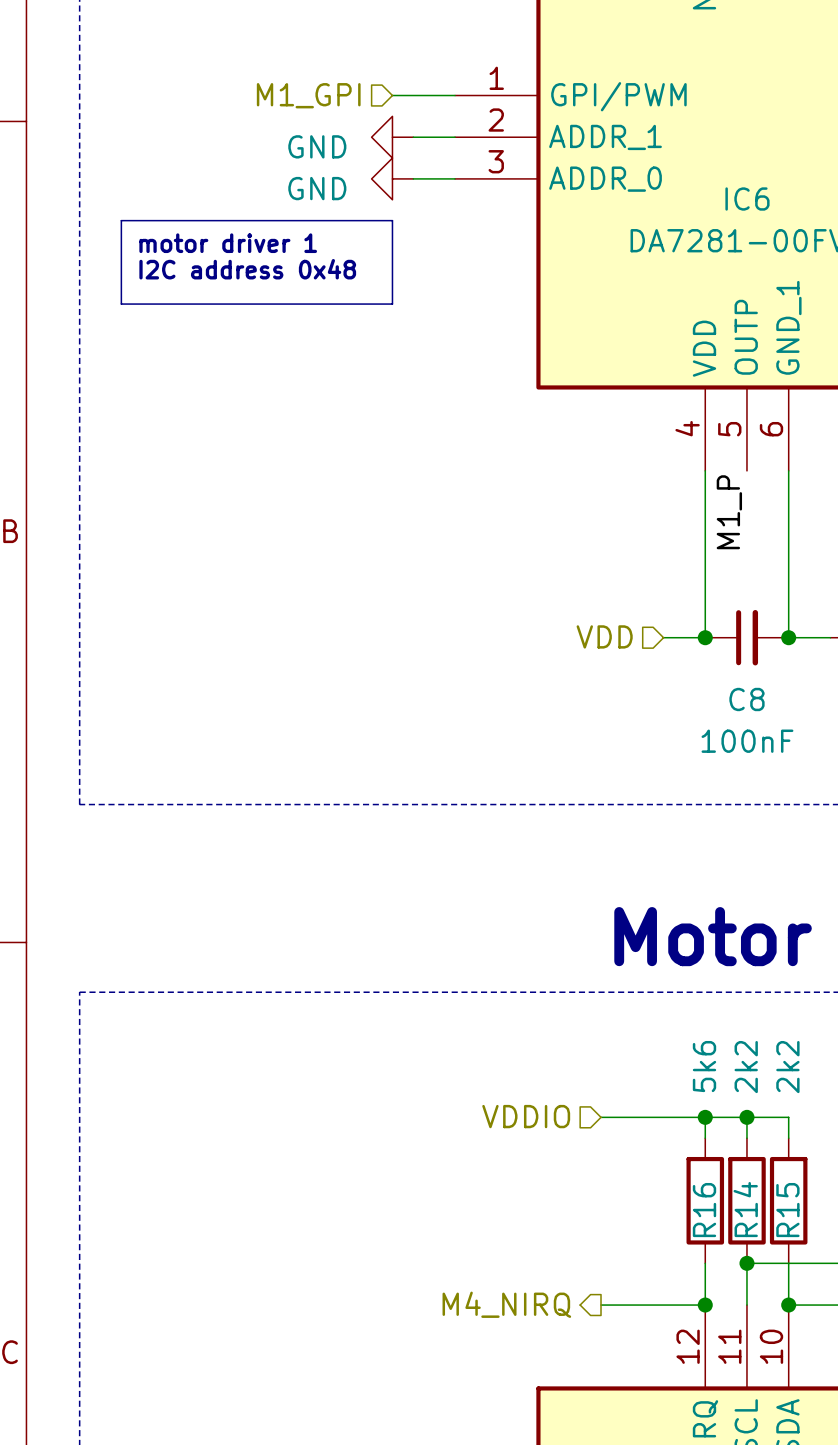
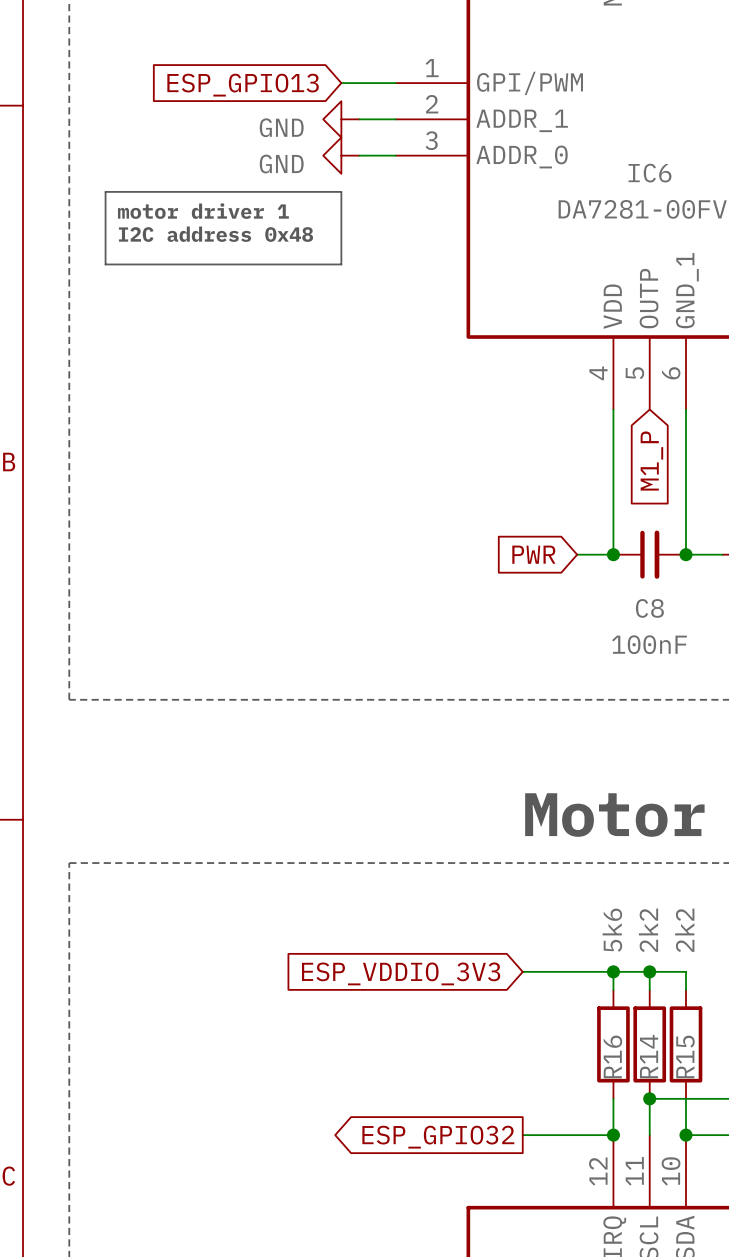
hierarchical label: M1_GPI (308, 95) -> none
global label: none -> ESP_GPIO13 (243, 85)
label: M1_P (729, 512) -> none
global label: none -> M1_P (651, 461)
hierarchical label: VDD (604, 636) -> none
global label: none -> PWR (533, 554)
hierarchical label: VDDIO (526, 1116) -> none
global label: none -> ESP_VDDIO_3V3 (401, 973)
hierarchical label: M4_NIRQ (506, 1304) -> none
global label: none -> ESP_GPIO32 (438, 1137)

